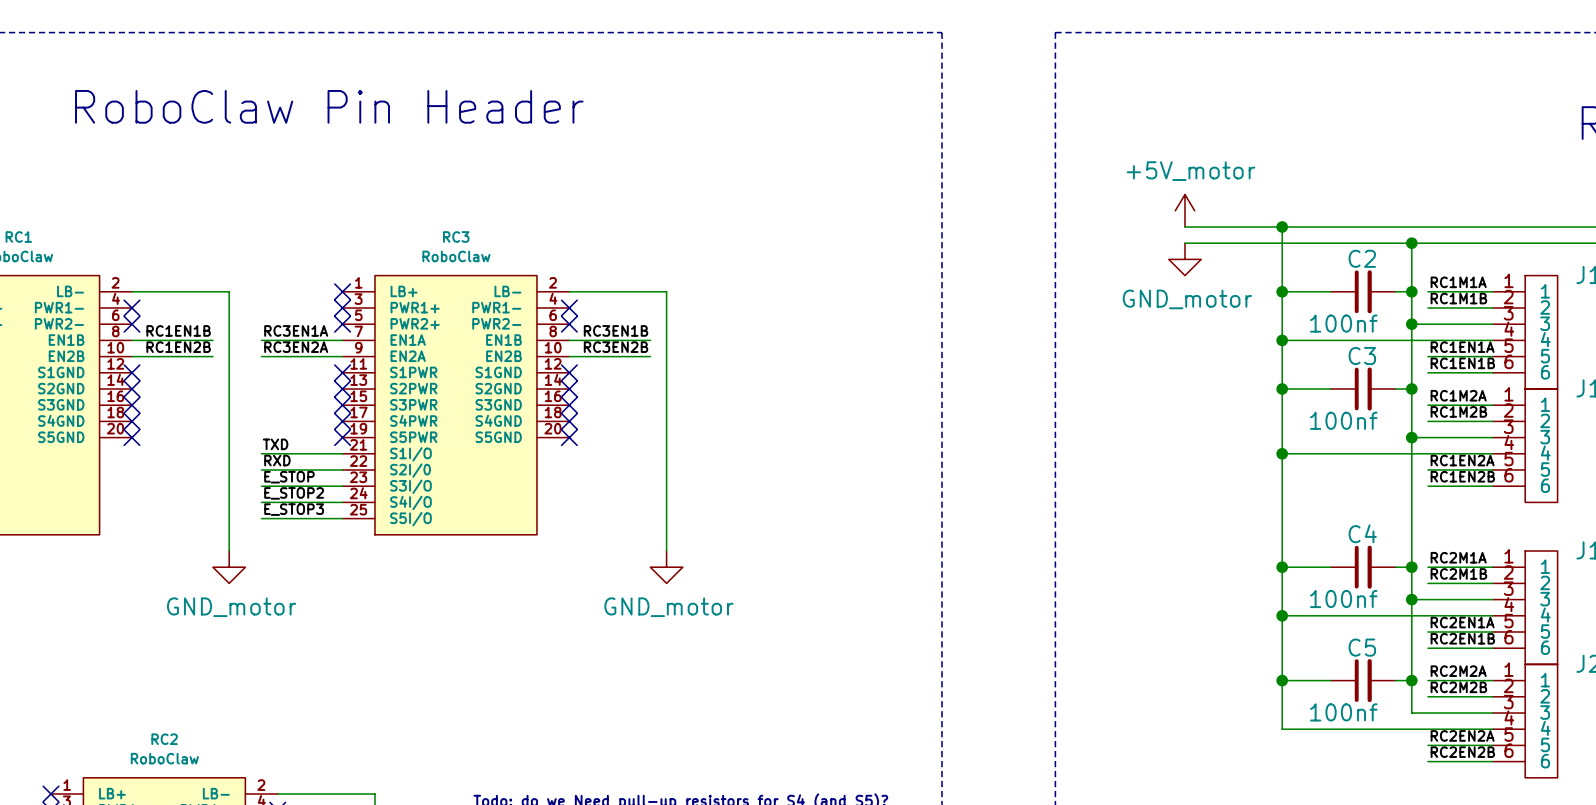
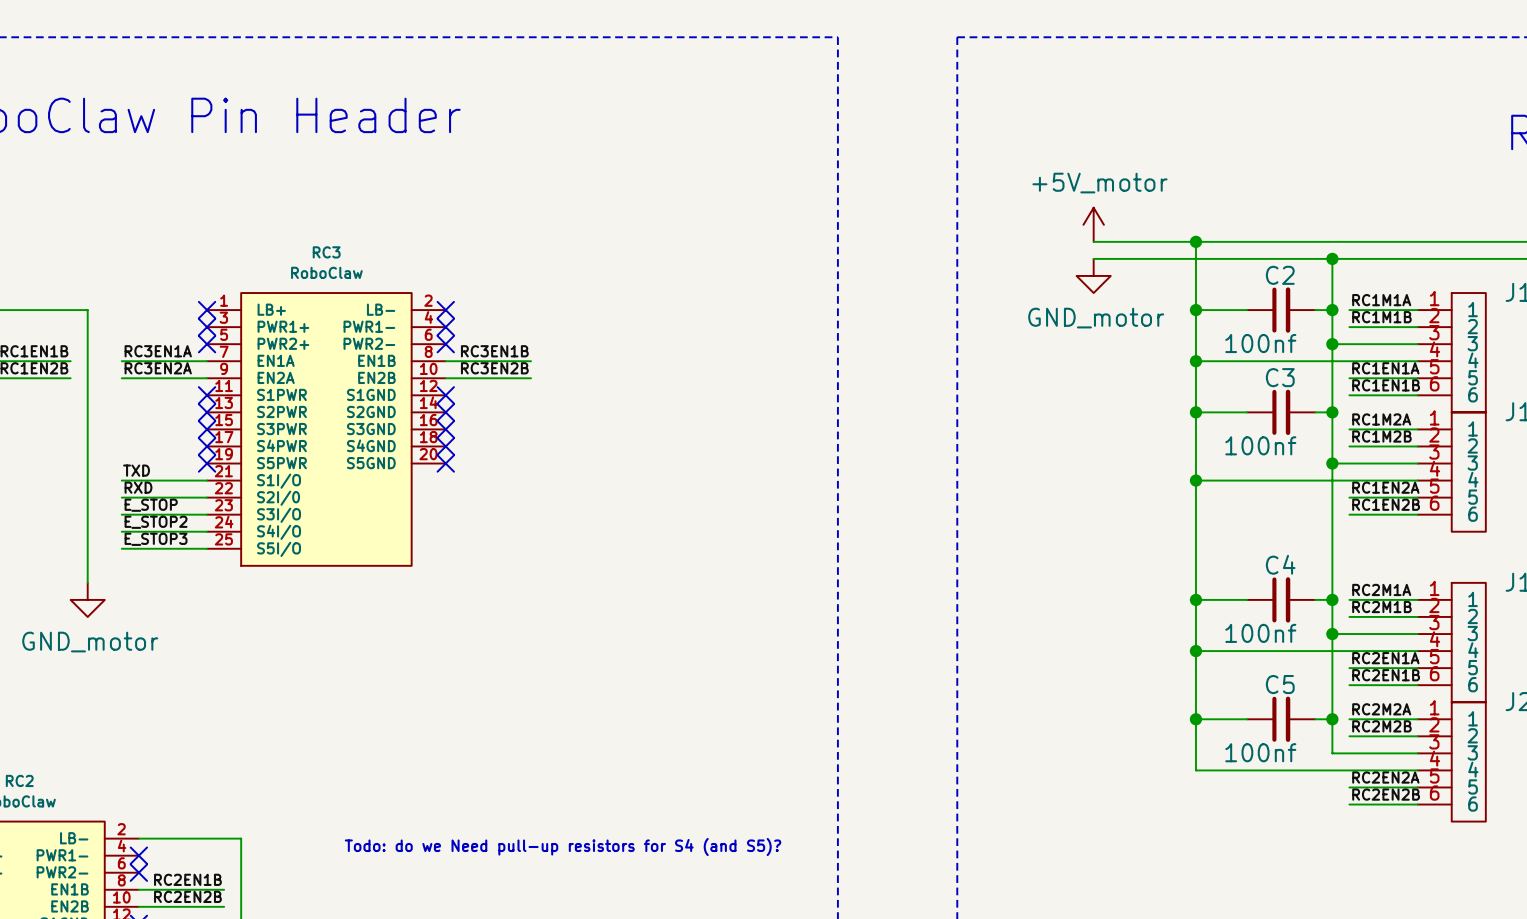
wire: (569, 291) (666, 291) (666, 551) -> none
no-connect mark: none -> (445, 310)
power symbol: GND_motor (666, 567) -> none

